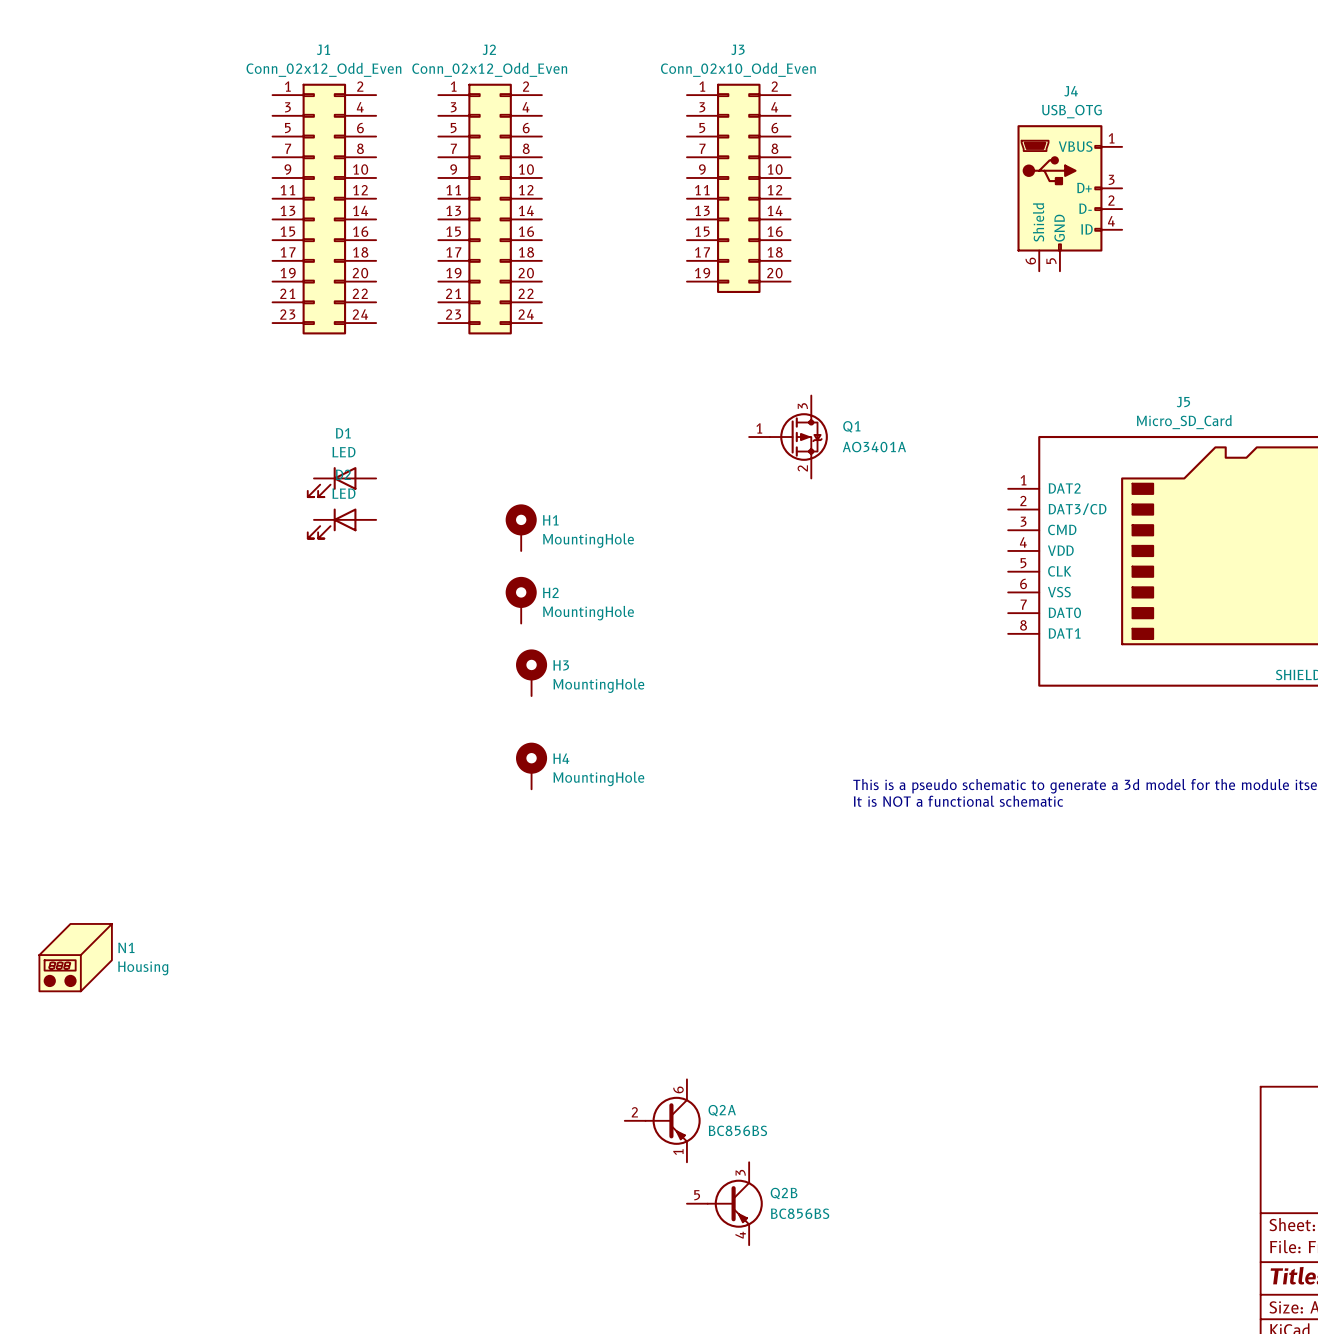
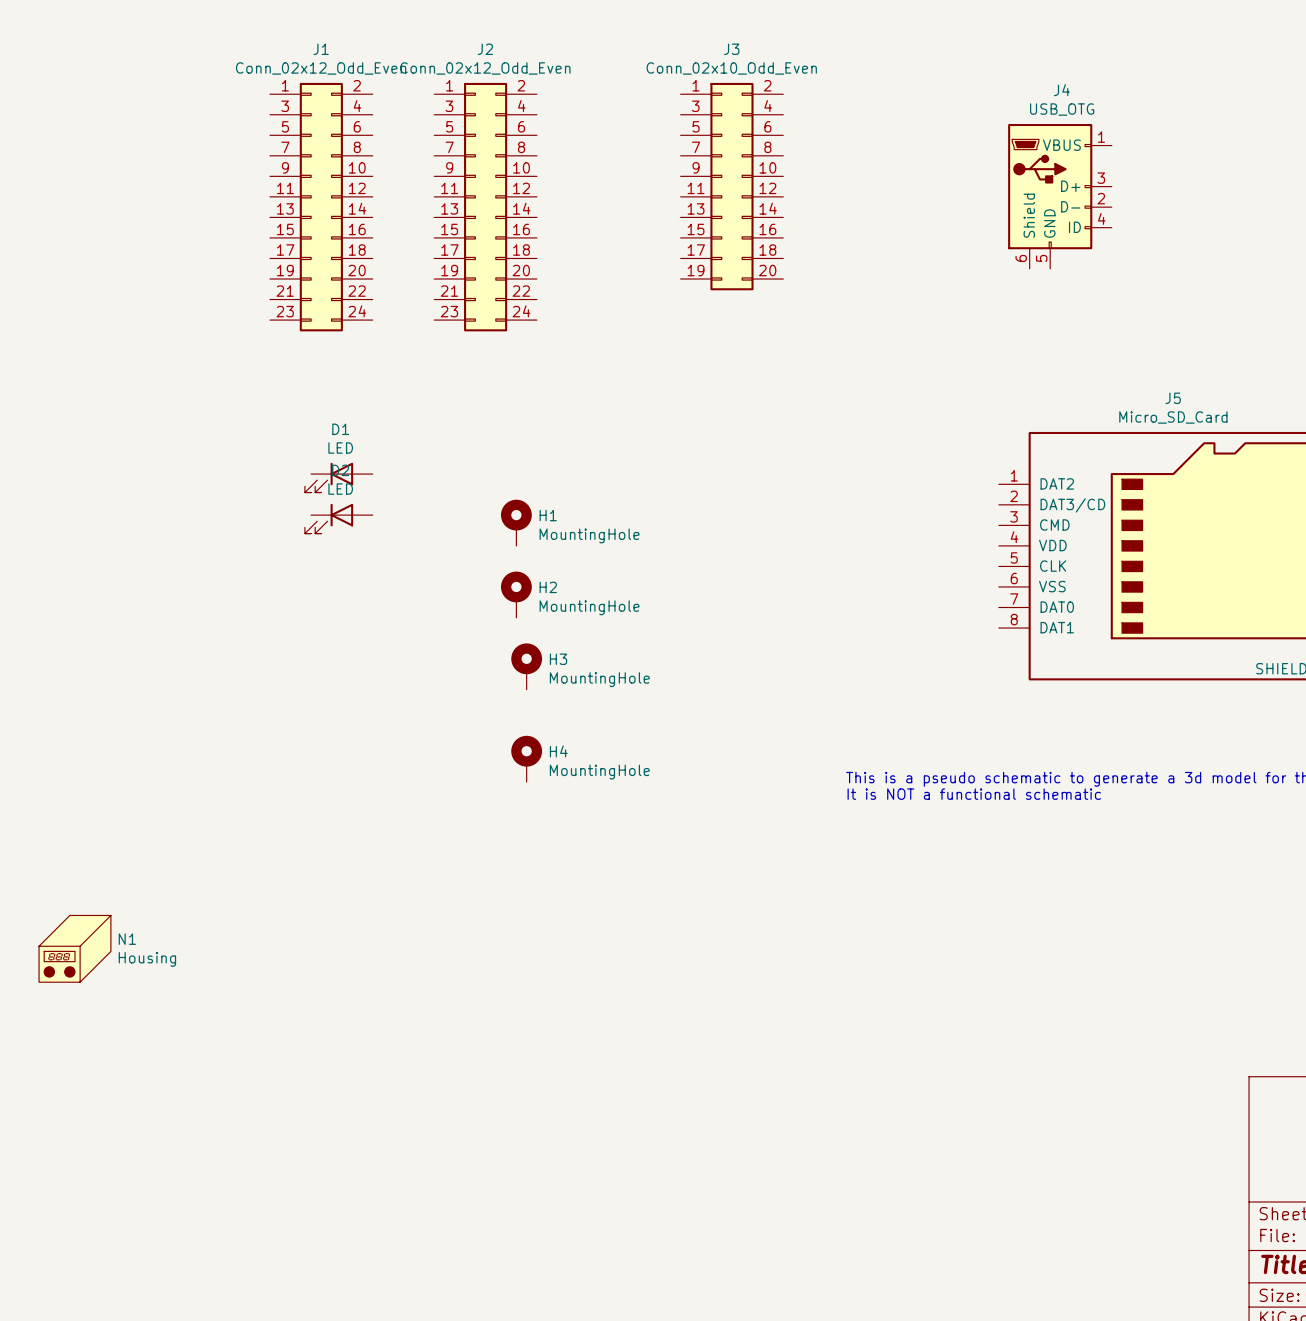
Q1: AO3401A (788, 437) -> none
Q2A: BC856BS (662, 1120) -> none
Q2B: BC856BS (724, 1203) -> none

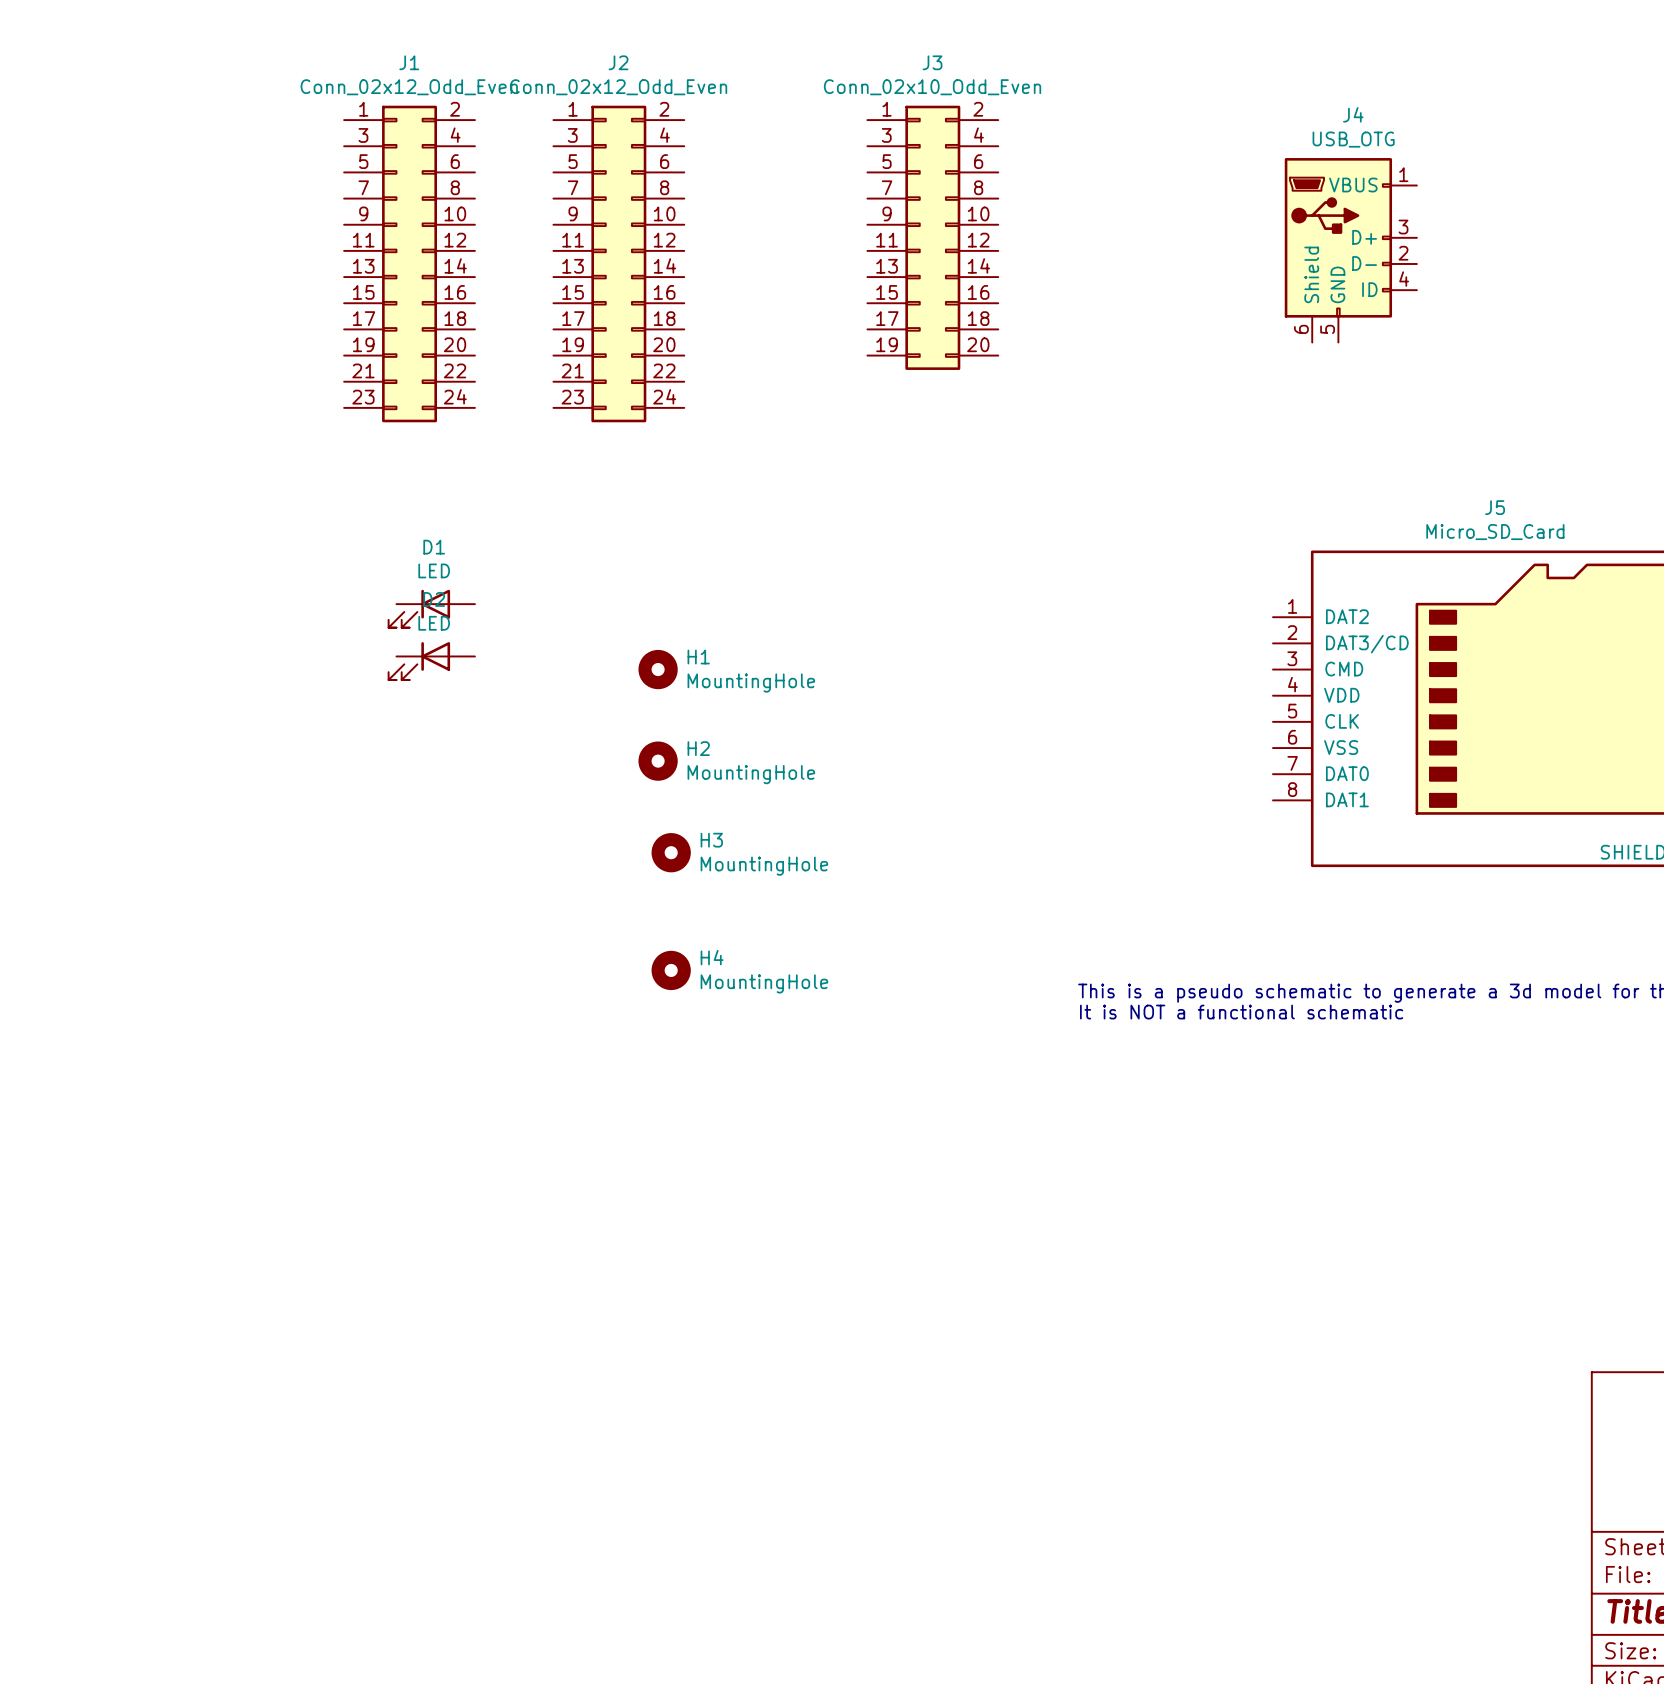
H1 symbol: [500, 499, 532, 546] -> [638, 649, 678, 690]
H2 symbol: [500, 571, 532, 618] -> [638, 741, 678, 781]
H3 symbol: [511, 643, 543, 690] -> [651, 833, 691, 873]
H4 symbol: [511, 735, 543, 783] -> [651, 950, 691, 991]
N1: Housing (74, 948) -> none

